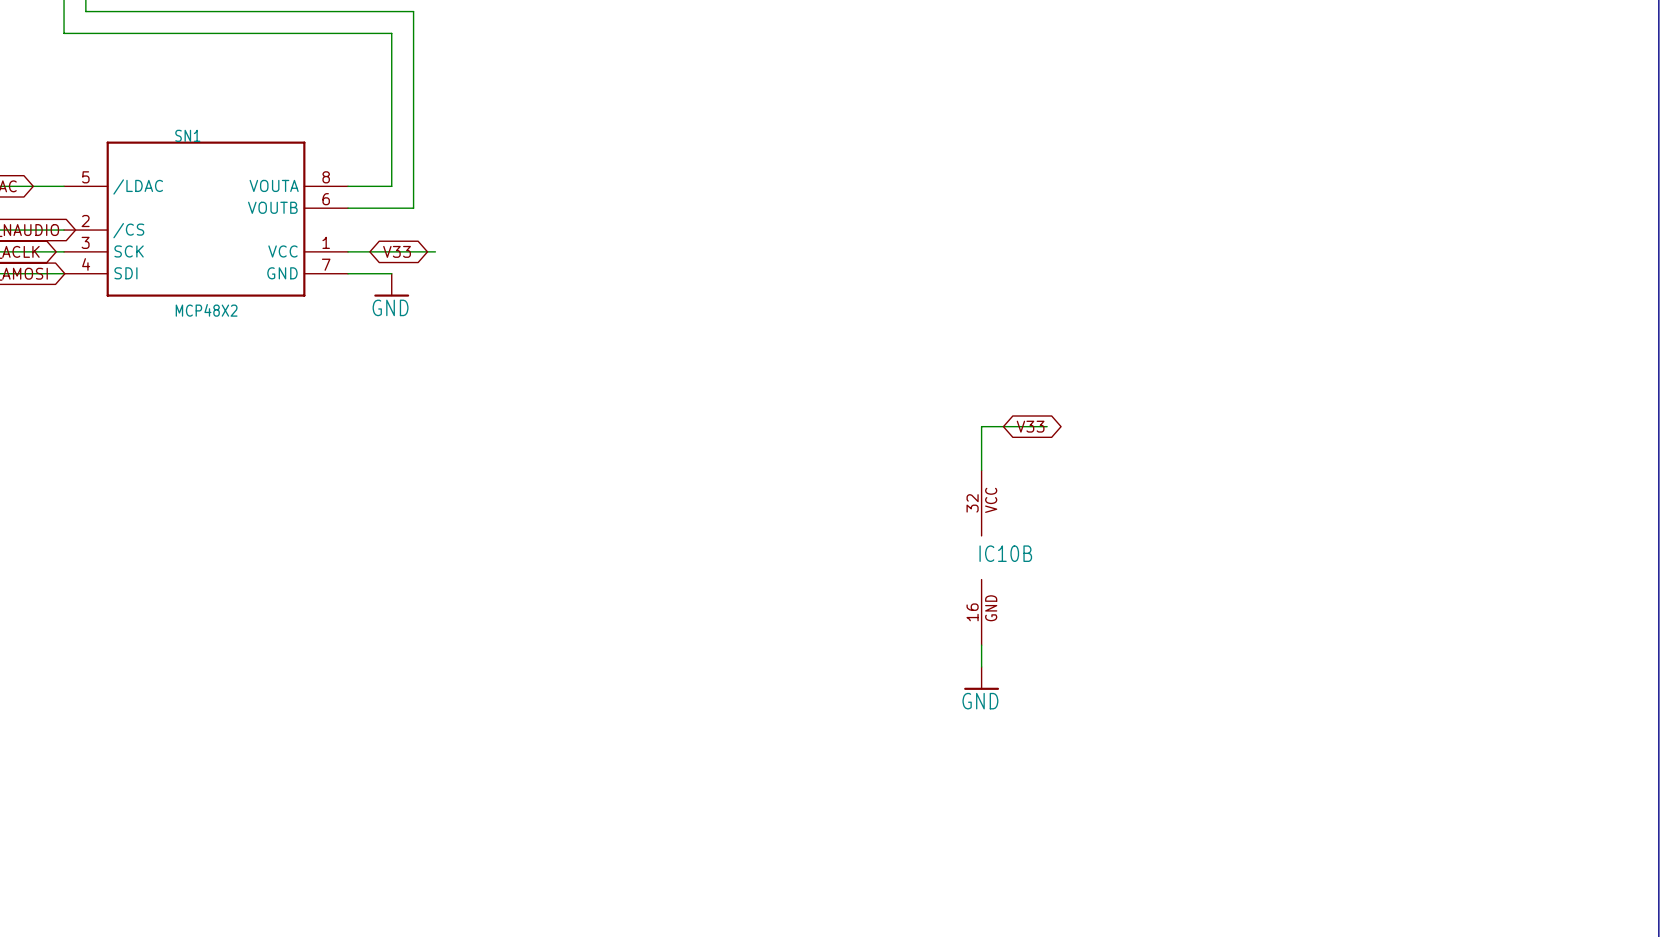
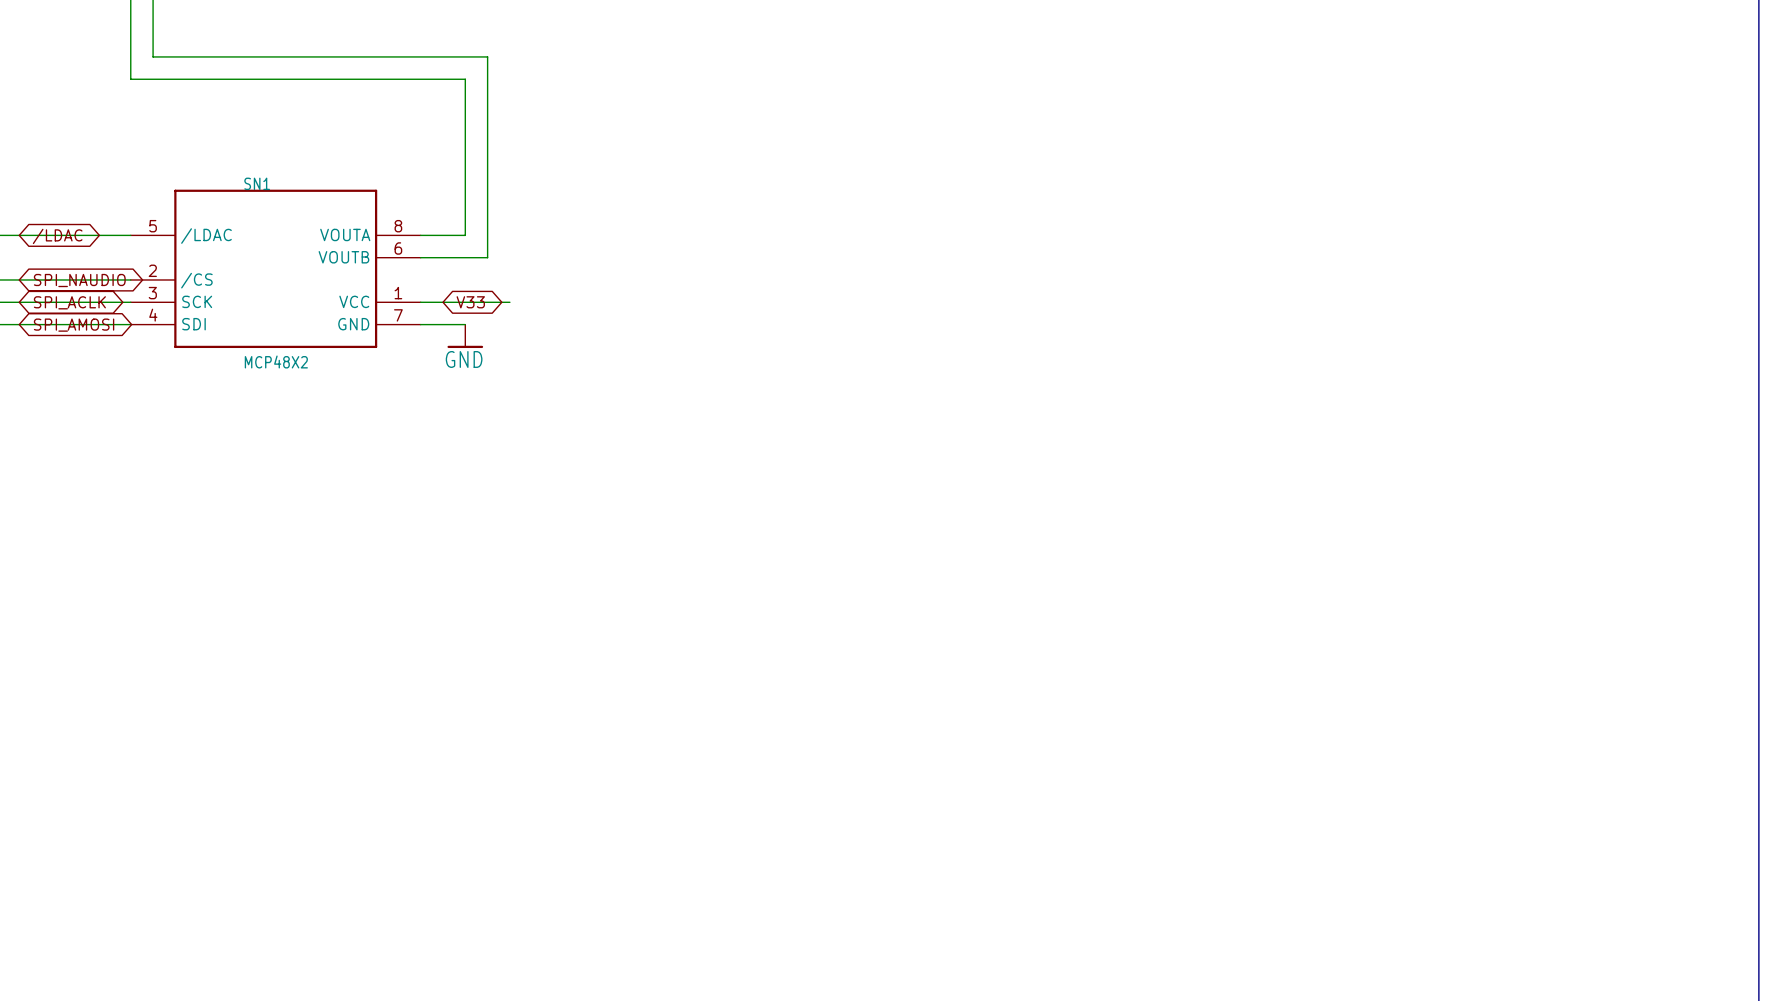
global label: V33 (1030, 426) -> none
wire: (1047, 426) (981, 426) (981, 470) -> none
IC10B: (981, 557) -> none
wire: (981, 645) (981, 666) -> none
power symbol: GND (981, 678) -> none

